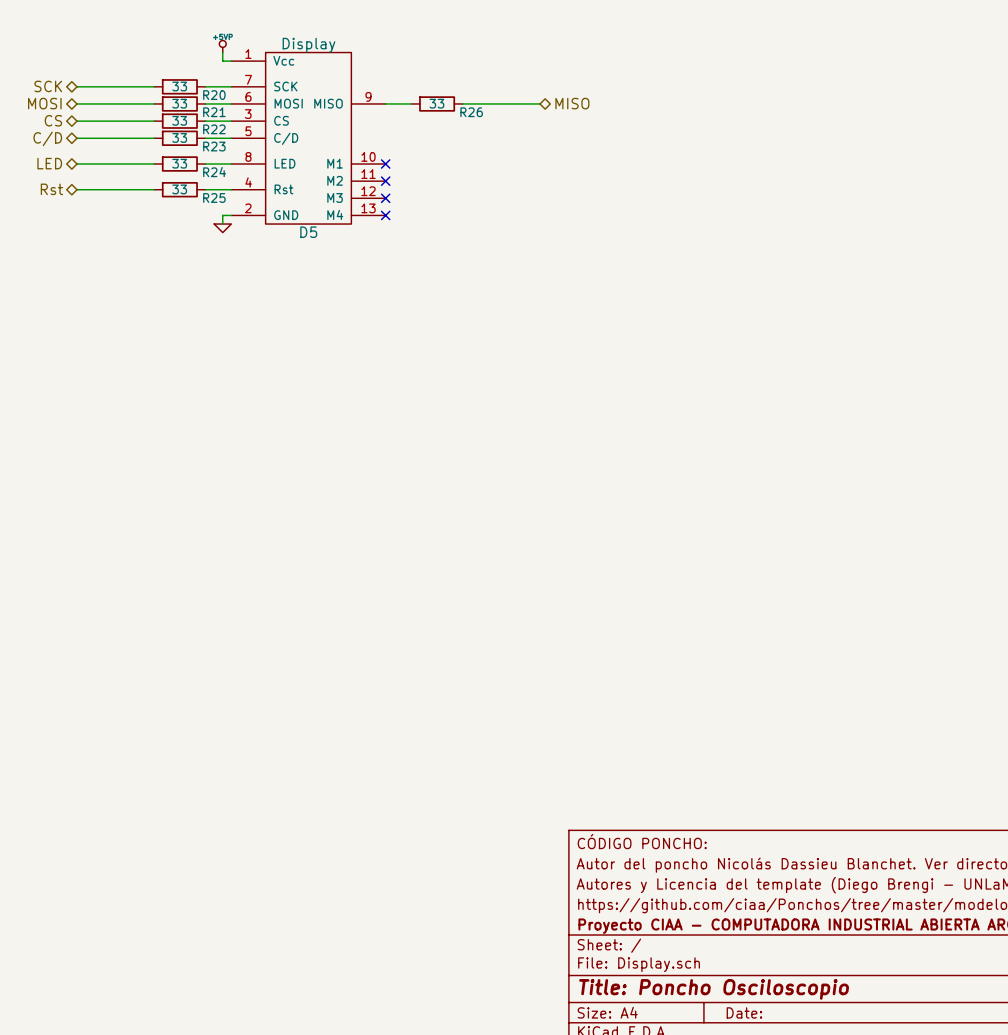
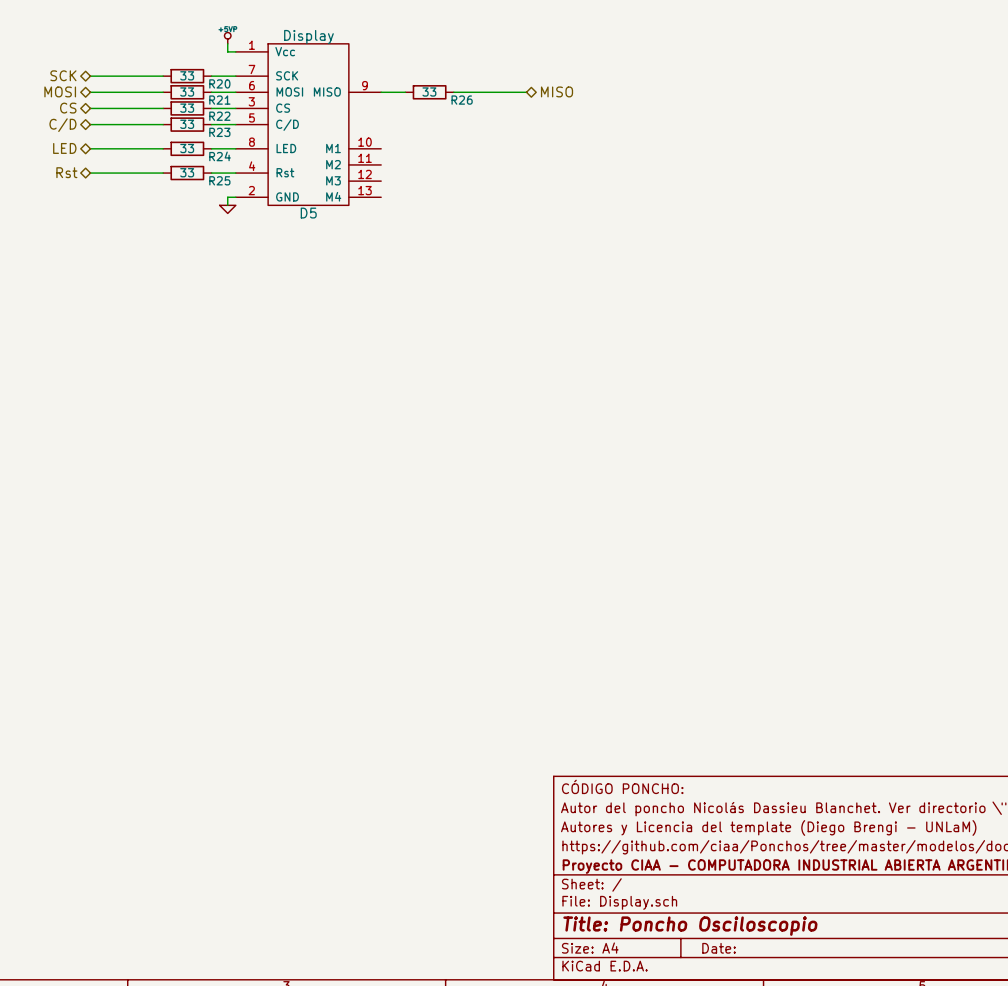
no-connect mark: (385, 164) -> none
no-connect mark: (385, 181) -> none
no-connect mark: (385, 198) -> none
no-connect mark: (385, 215) -> none

